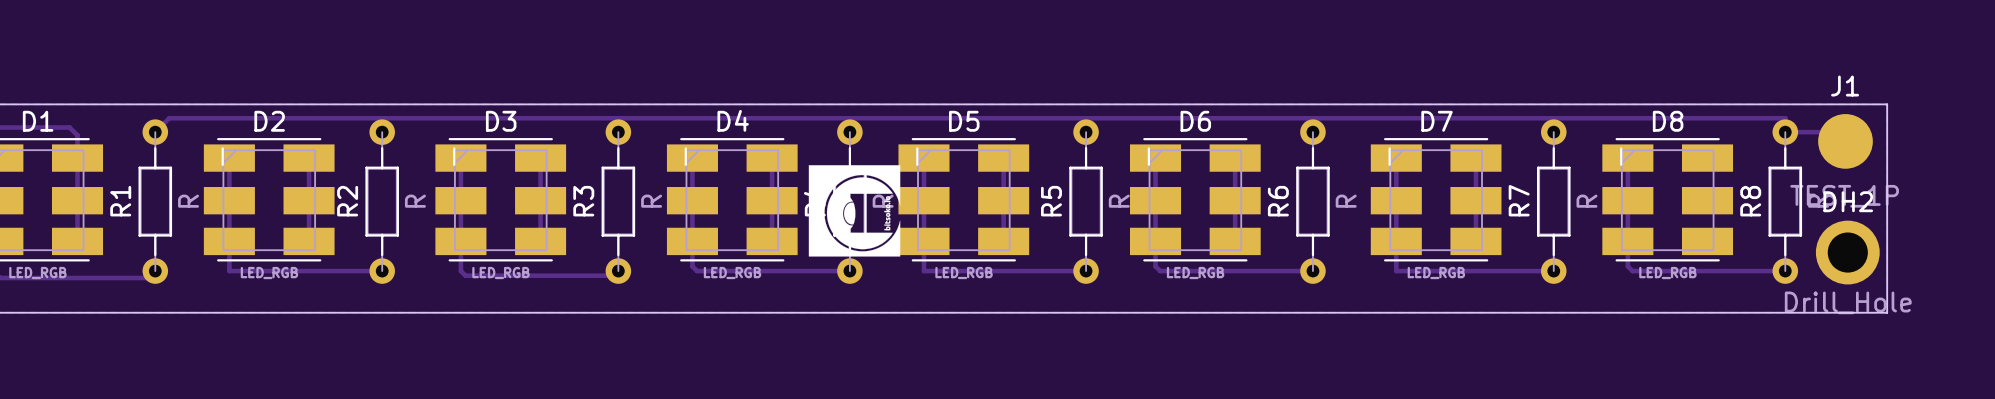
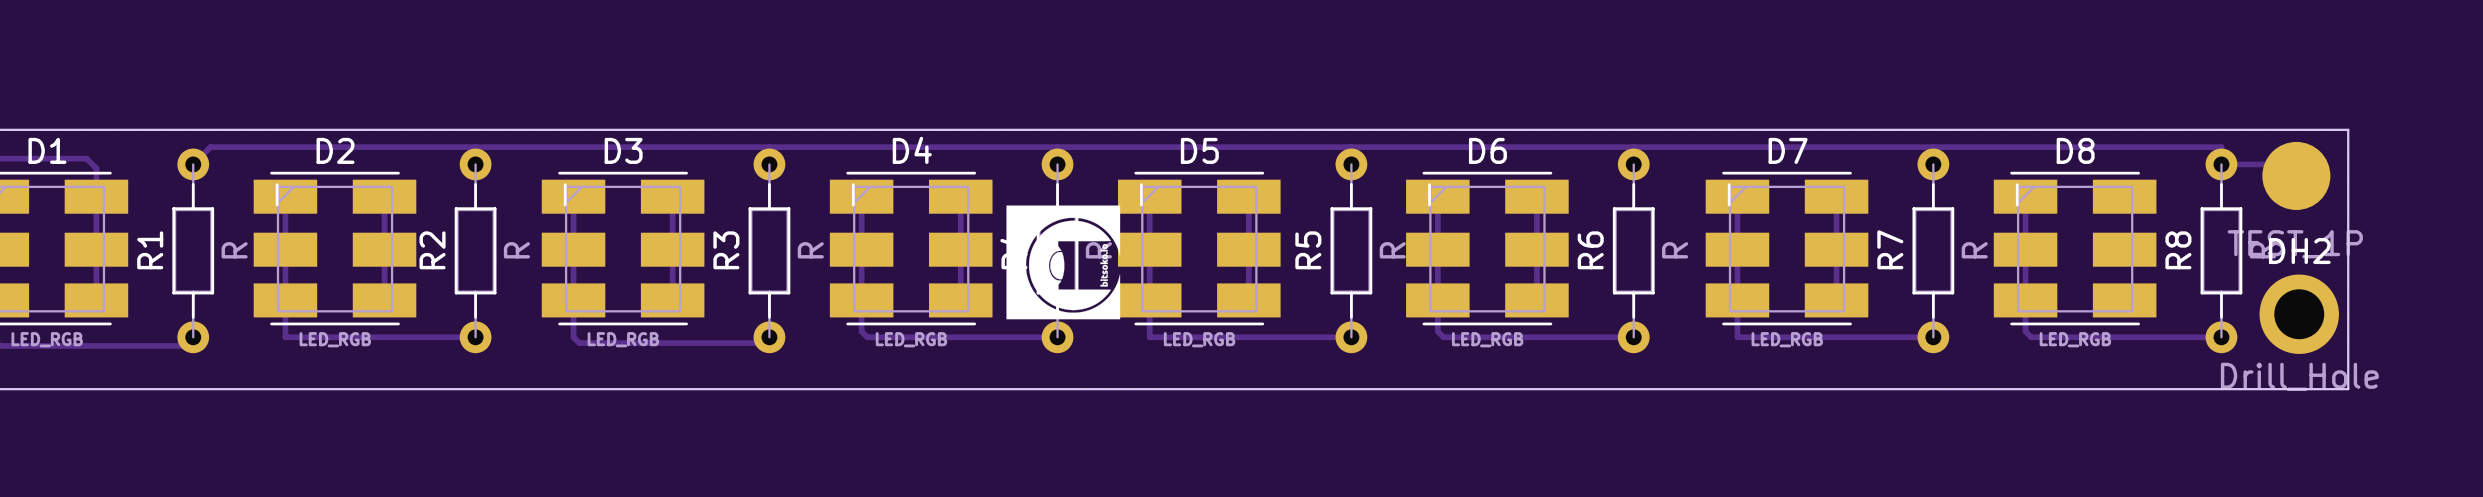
J1 name: J1 (1845, 86) -> none

